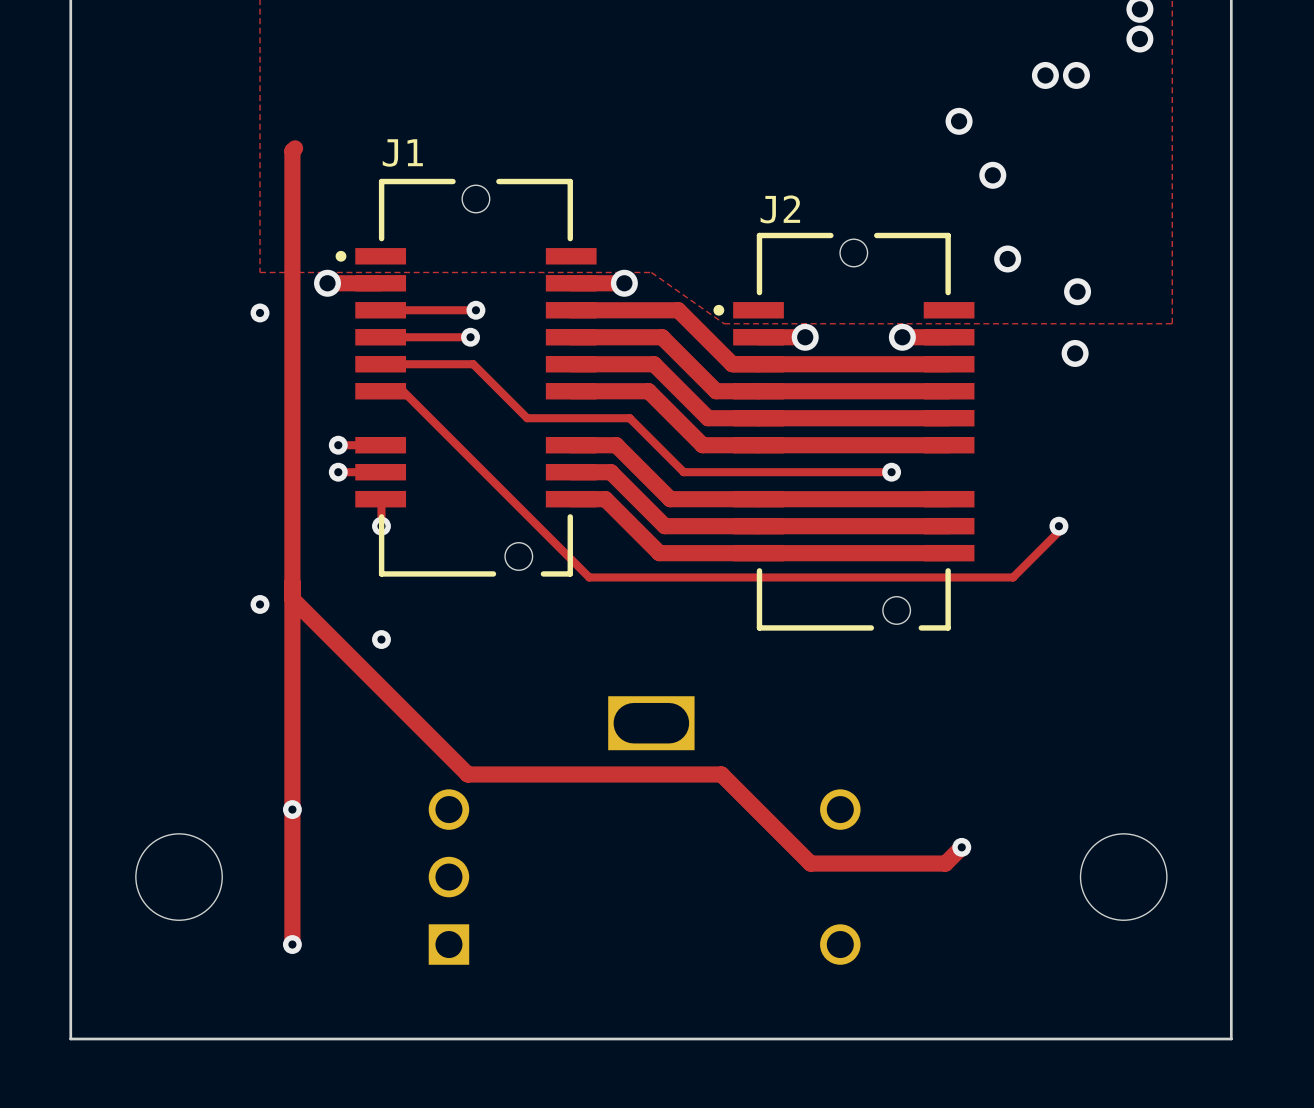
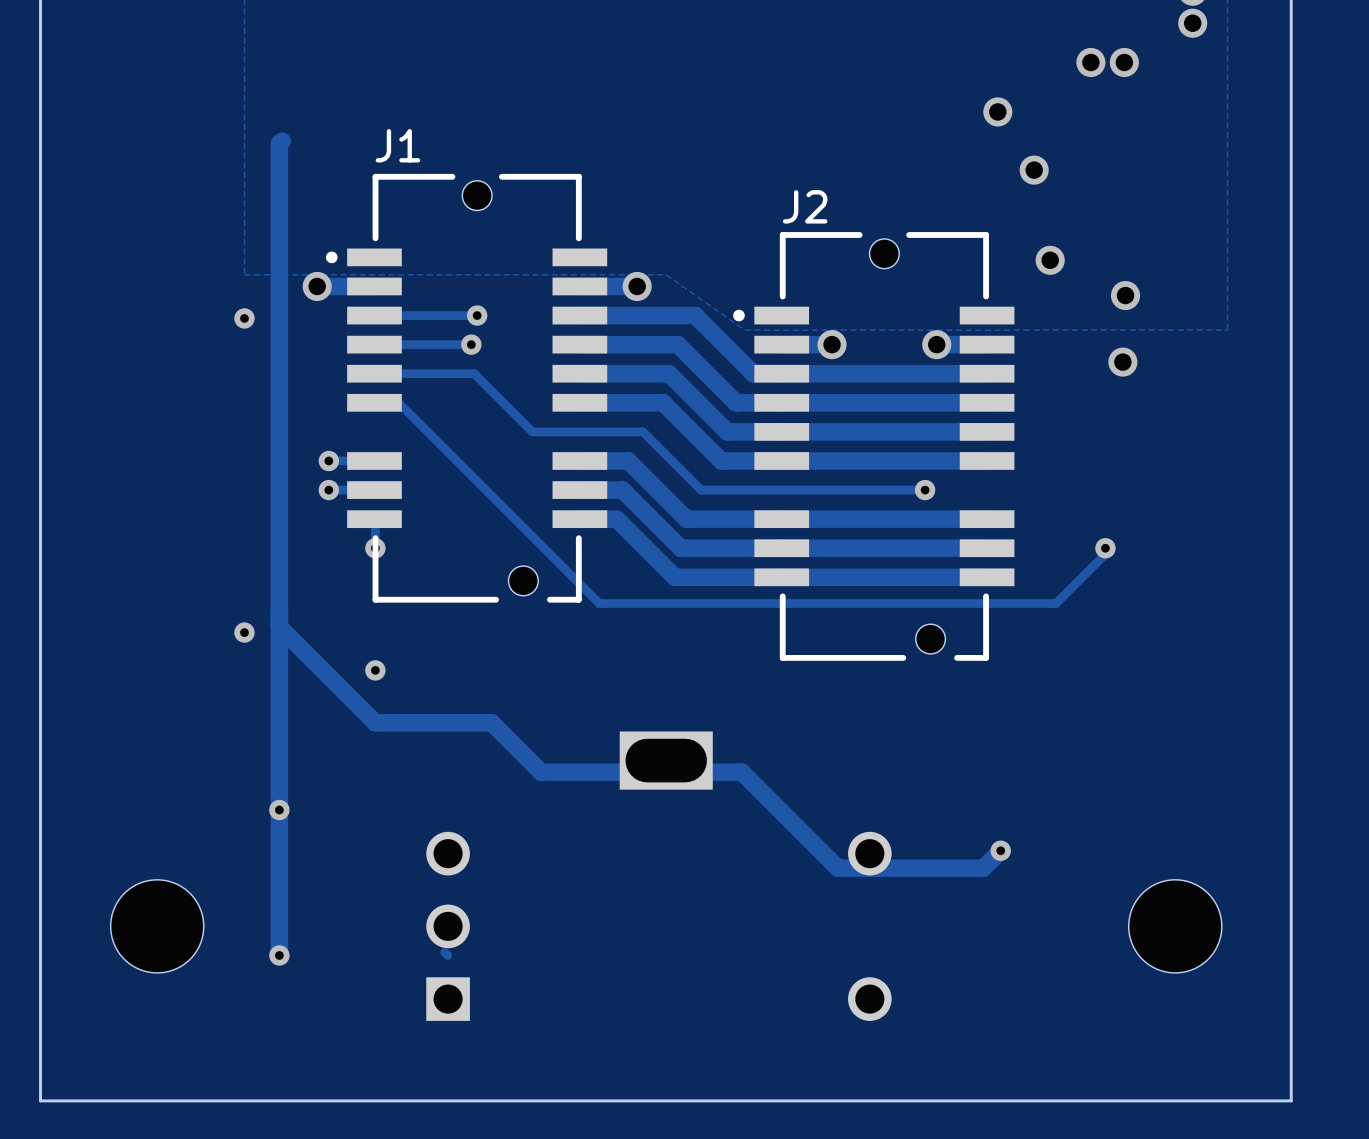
track: (381, 688) (467, 774) (721, 774) (810, 863) (945, 863) (961, 847) -> (375, 722) (491, 722) (541, 772) (741, 772) (837, 868) (983, 868) (1000, 850)
via position: (292, 809) -> (279, 810)
via position: (961, 847) -> (1000, 850)
track: none -> (444, 952) (447, 955)
track: (292, 904) (292, 944) -> none
via position: (292, 944) -> (279, 955)

